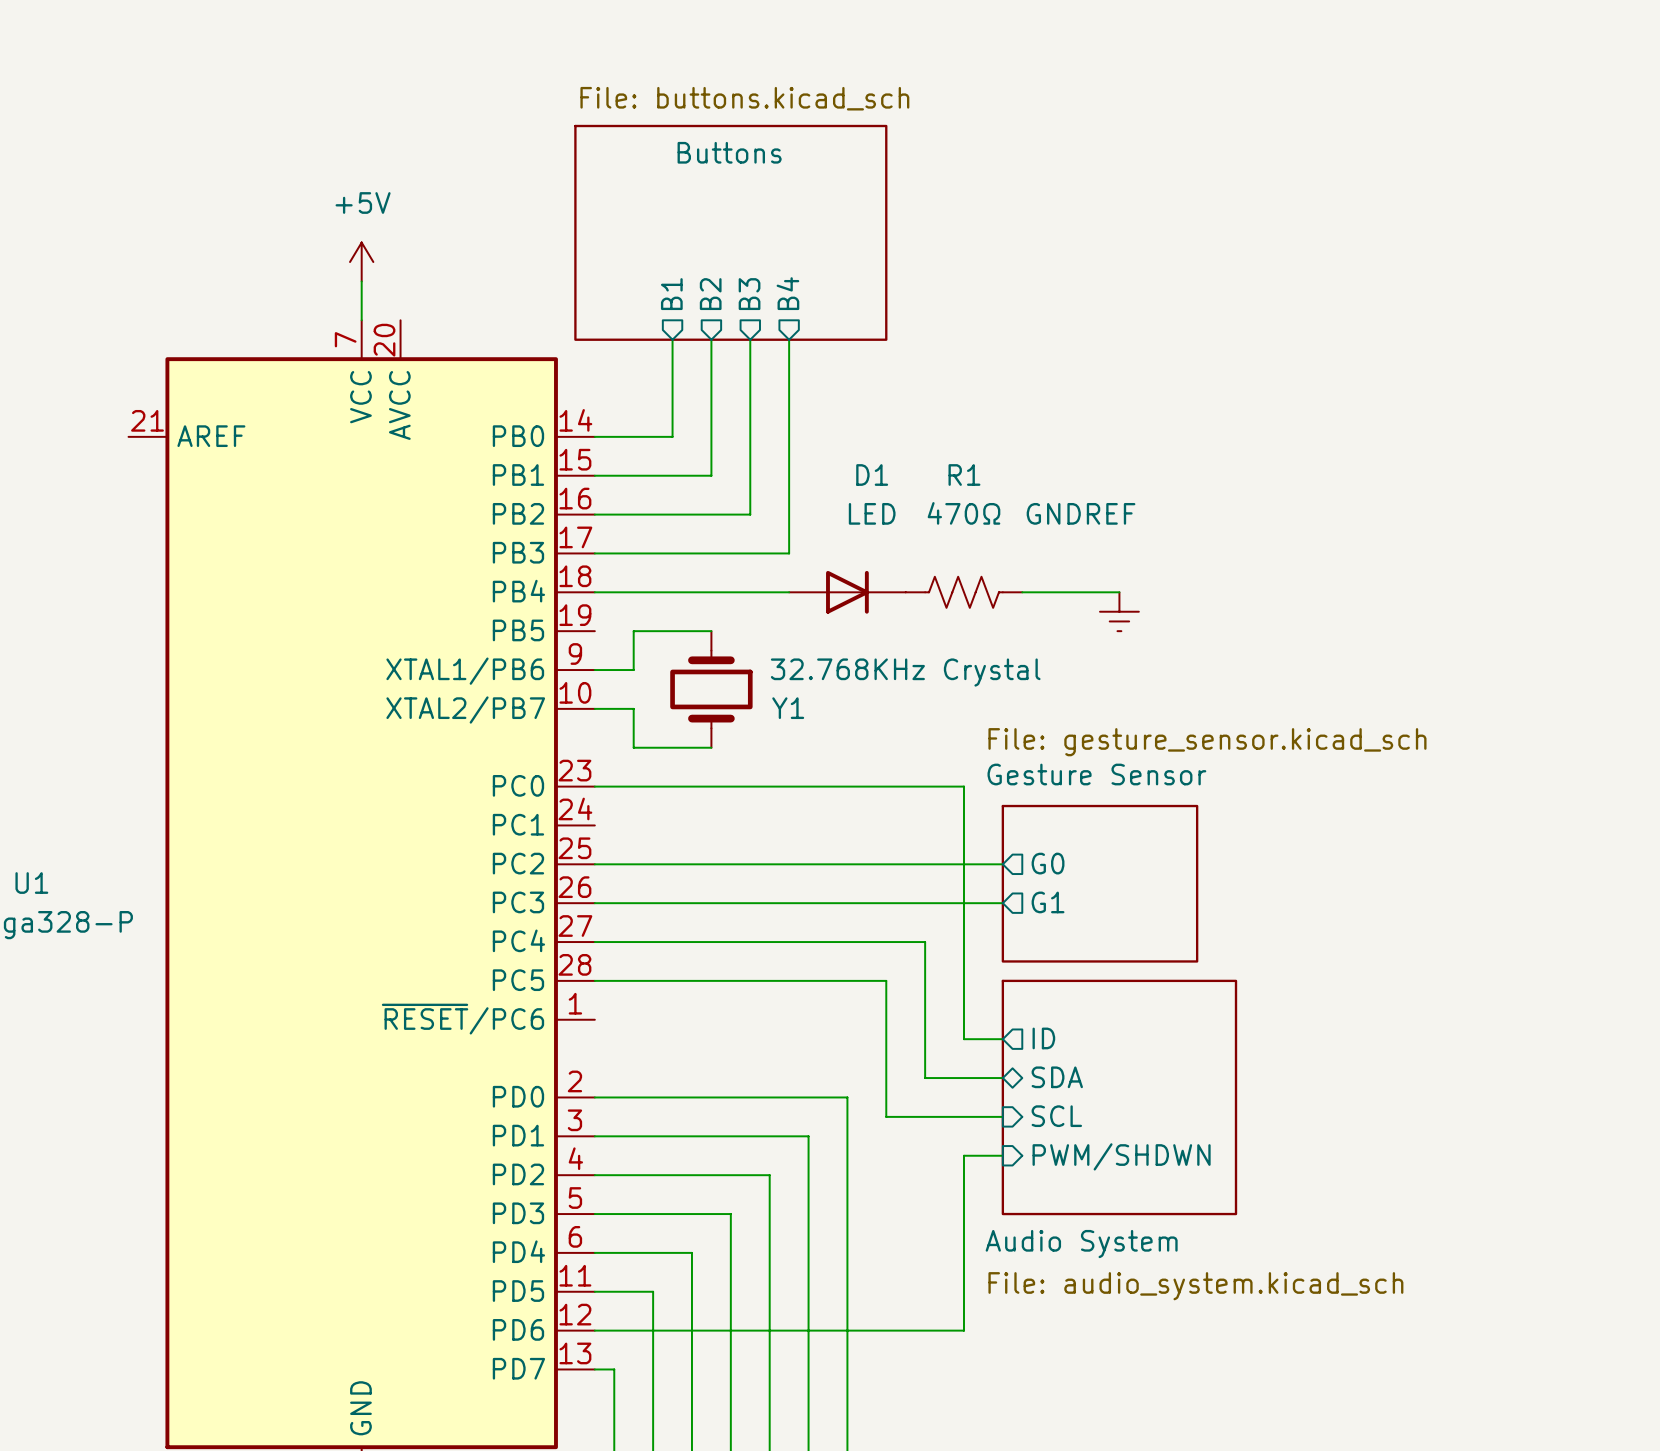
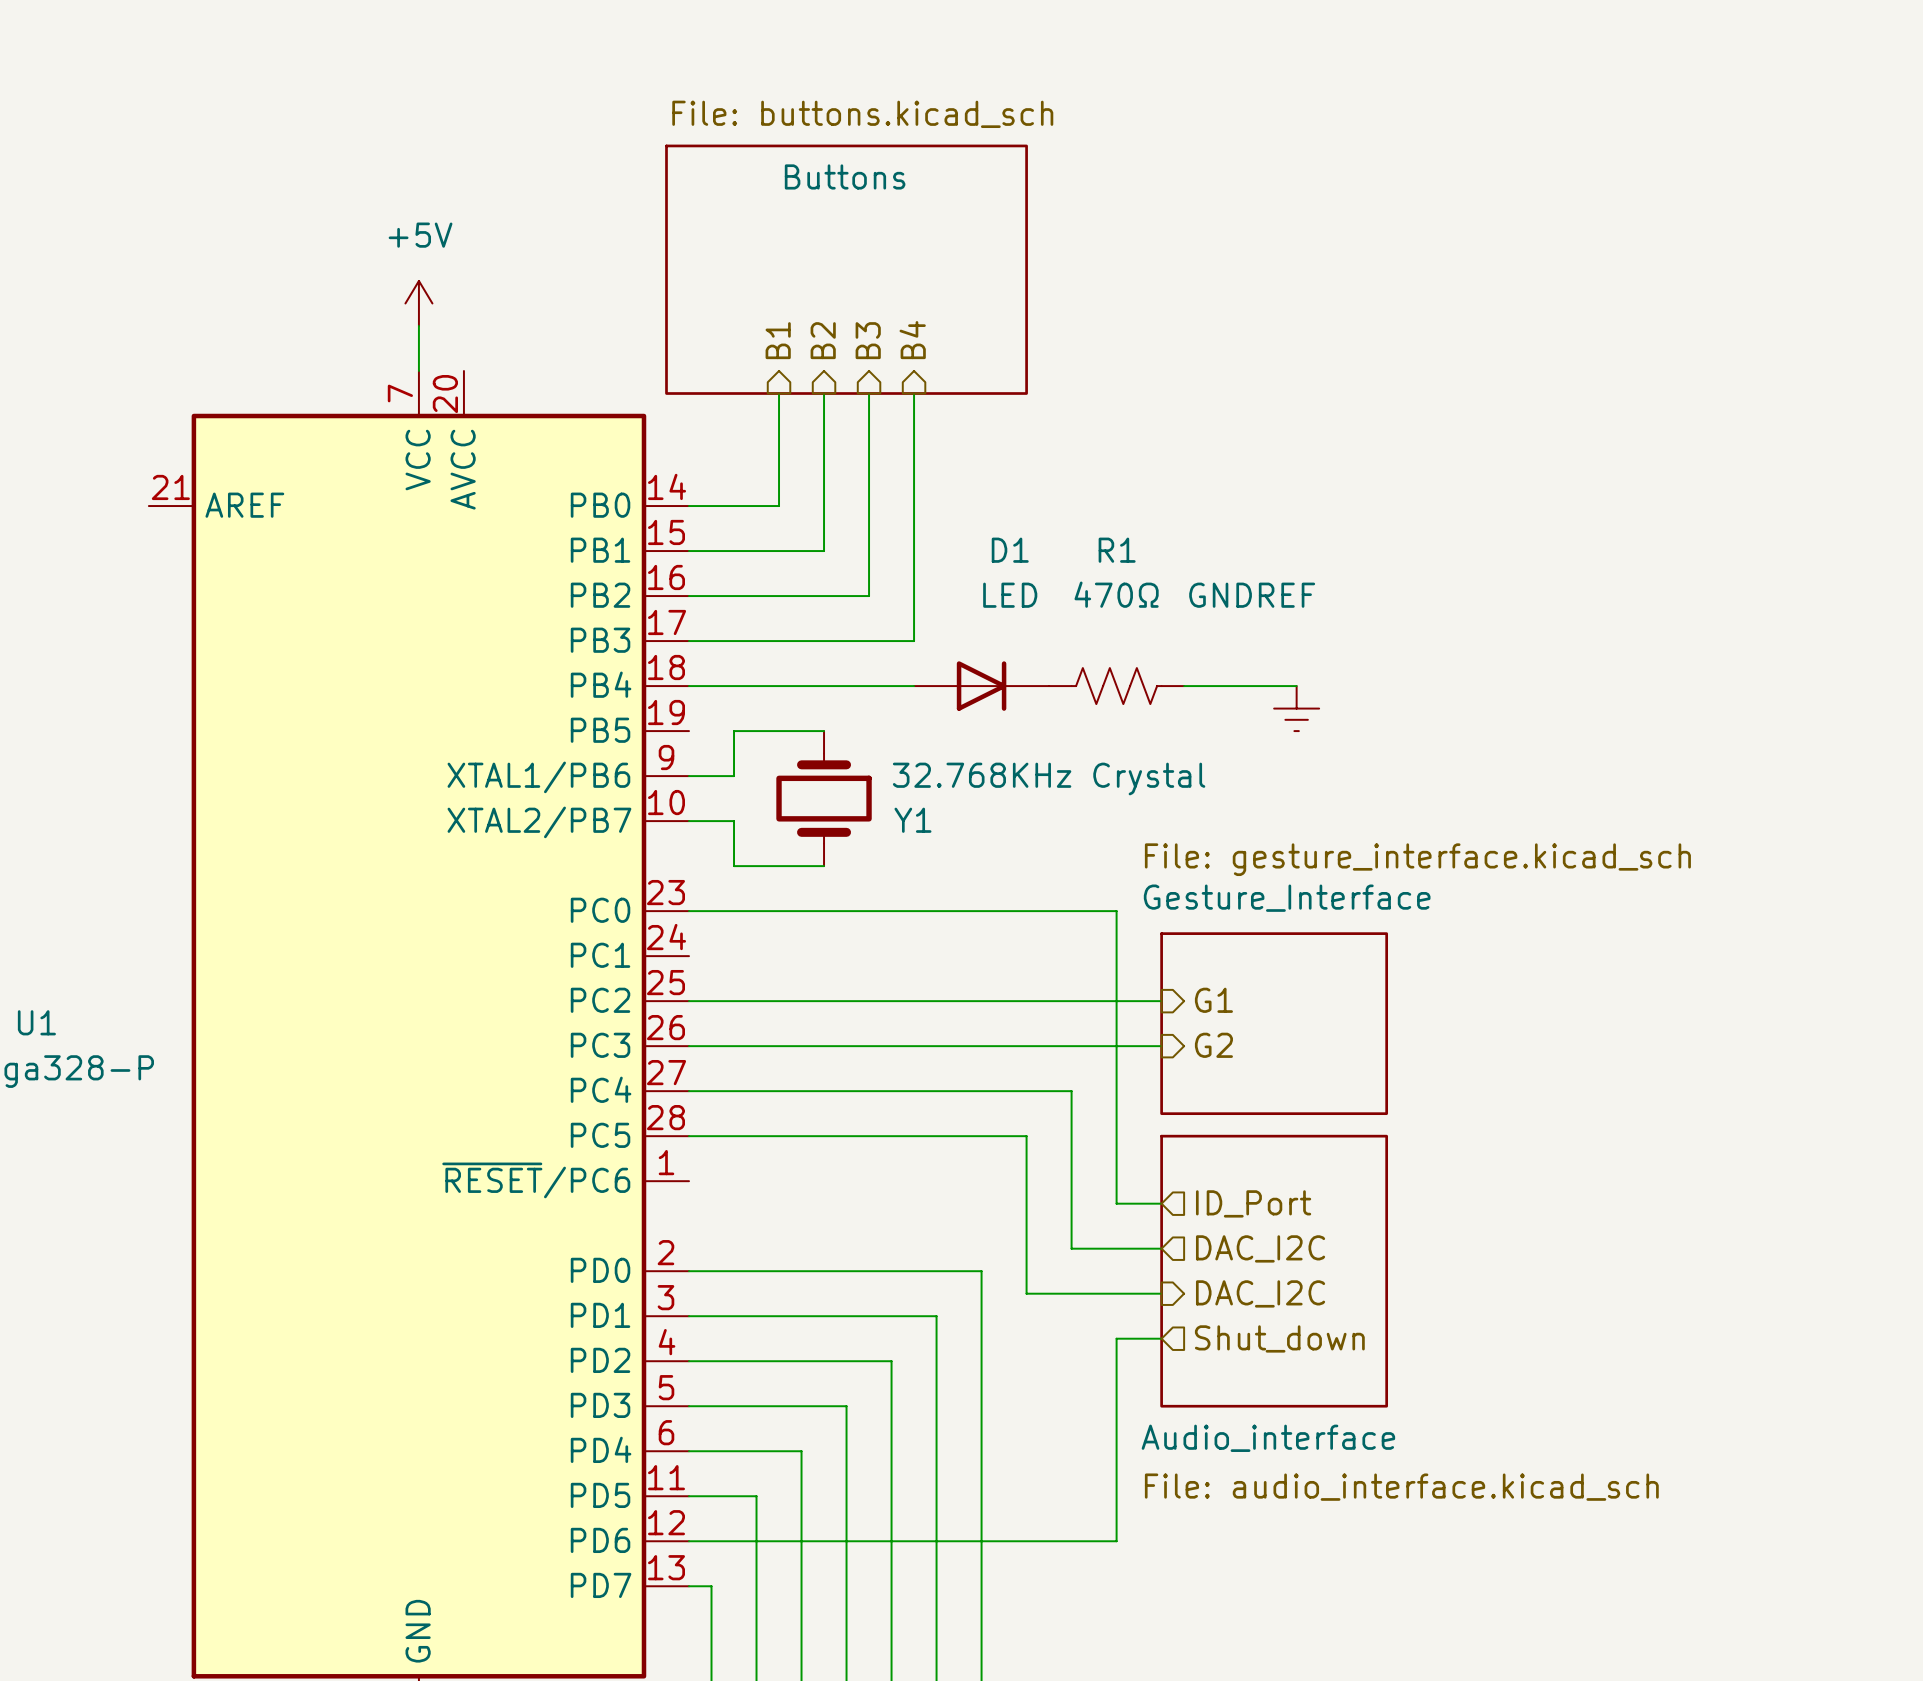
sheet pin: B4 (787, 293) -> none
hierarchical label: none -> B4 (912, 340)
sheet pin: B1 (671, 294) -> none
hierarchical label: none -> B1 (778, 340)
sheet pin: B2 (710, 294) -> none
hierarchical label: none -> B2 (823, 340)
sheet pin: B3 (749, 294) -> none
hierarchical label: none -> B3 (868, 340)
sheet Gesture Sensor value: File: gesture_sensor.kicad_sch (1207, 742) -> File: gesture_interface.kicad_sch (1417, 859)
sheet Gesture Sensor name: Gesture Sensor (1096, 774) -> Gesture_Interface (1287, 898)
sheet pin: G0 (1048, 863) -> none
hierarchical label: none -> G1 (1213, 1000)
sheet pin: G1 (1048, 902) -> none
hierarchical label: none -> G2 (1213, 1045)
sheet pin: ID (1043, 1038) -> none
hierarchical label: none -> ID_Port (1253, 1203)
sheet pin: SDA (1057, 1077) -> none
hierarchical label: none -> DAC_I2C (1260, 1248)
sheet Audio_interface: none -> File: audio_interface.kicad_sch (1274, 1271)
sheet Audio System: File: audio_system.kicad_sch (1119, 1097) -> none
sheet pin: SCL (1056, 1116) -> none
hierarchical label: none -> DAC_I2C (1260, 1293)
hierarchical label: none -> Shut_down (1279, 1338)
sheet pin: PWM/SHDWN (1121, 1156) -> none

